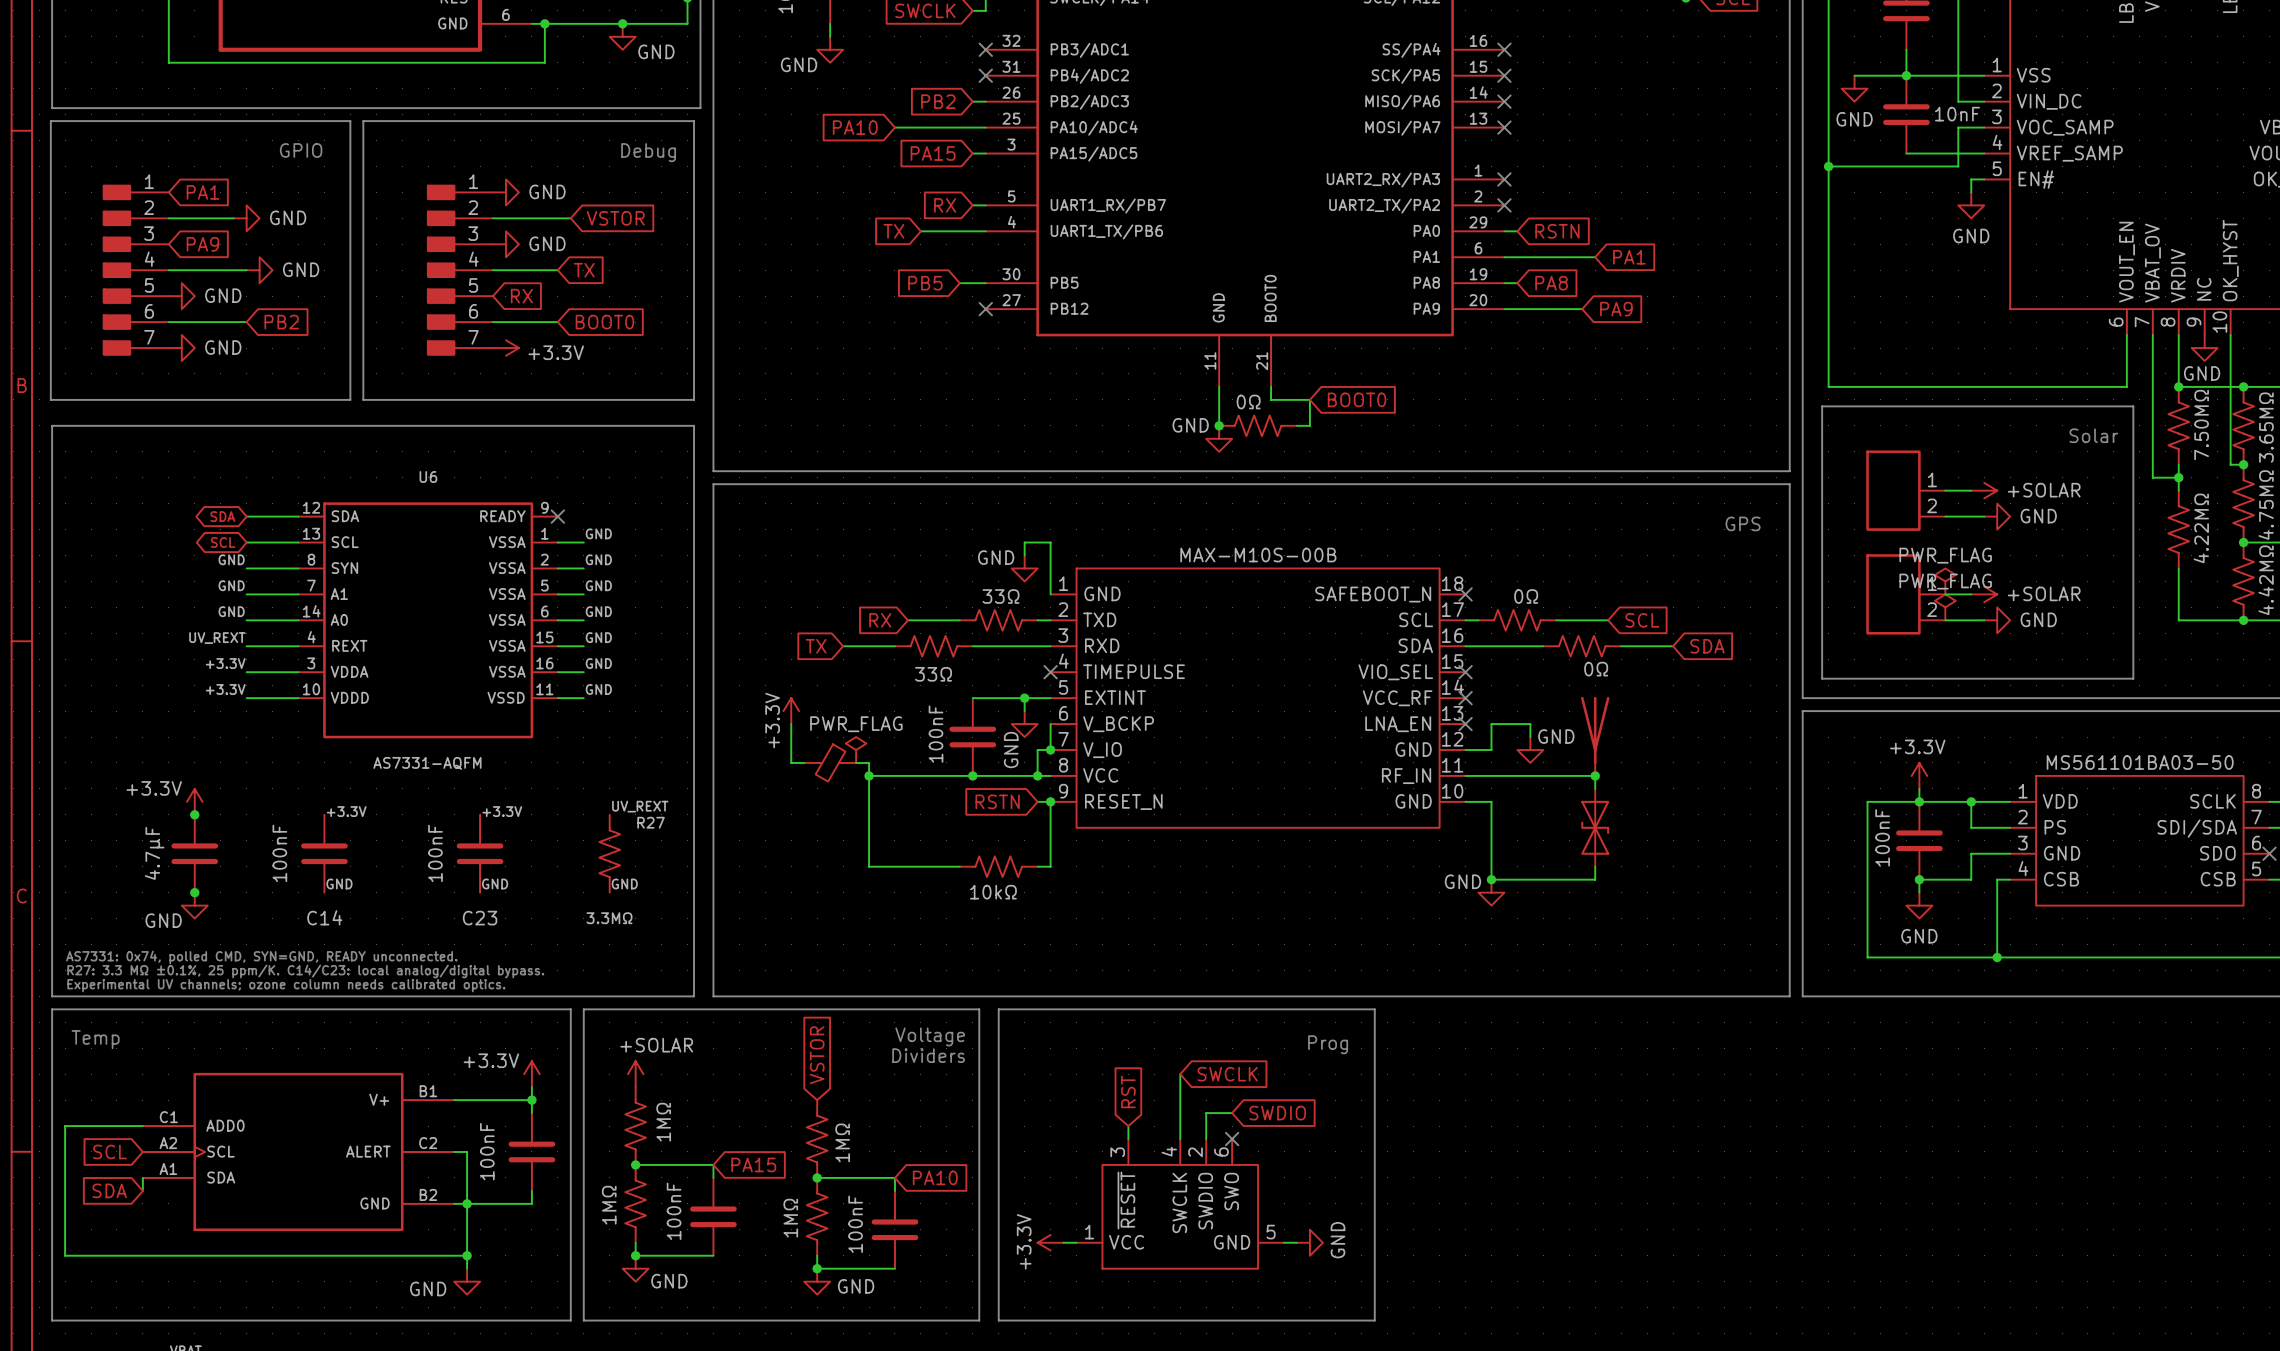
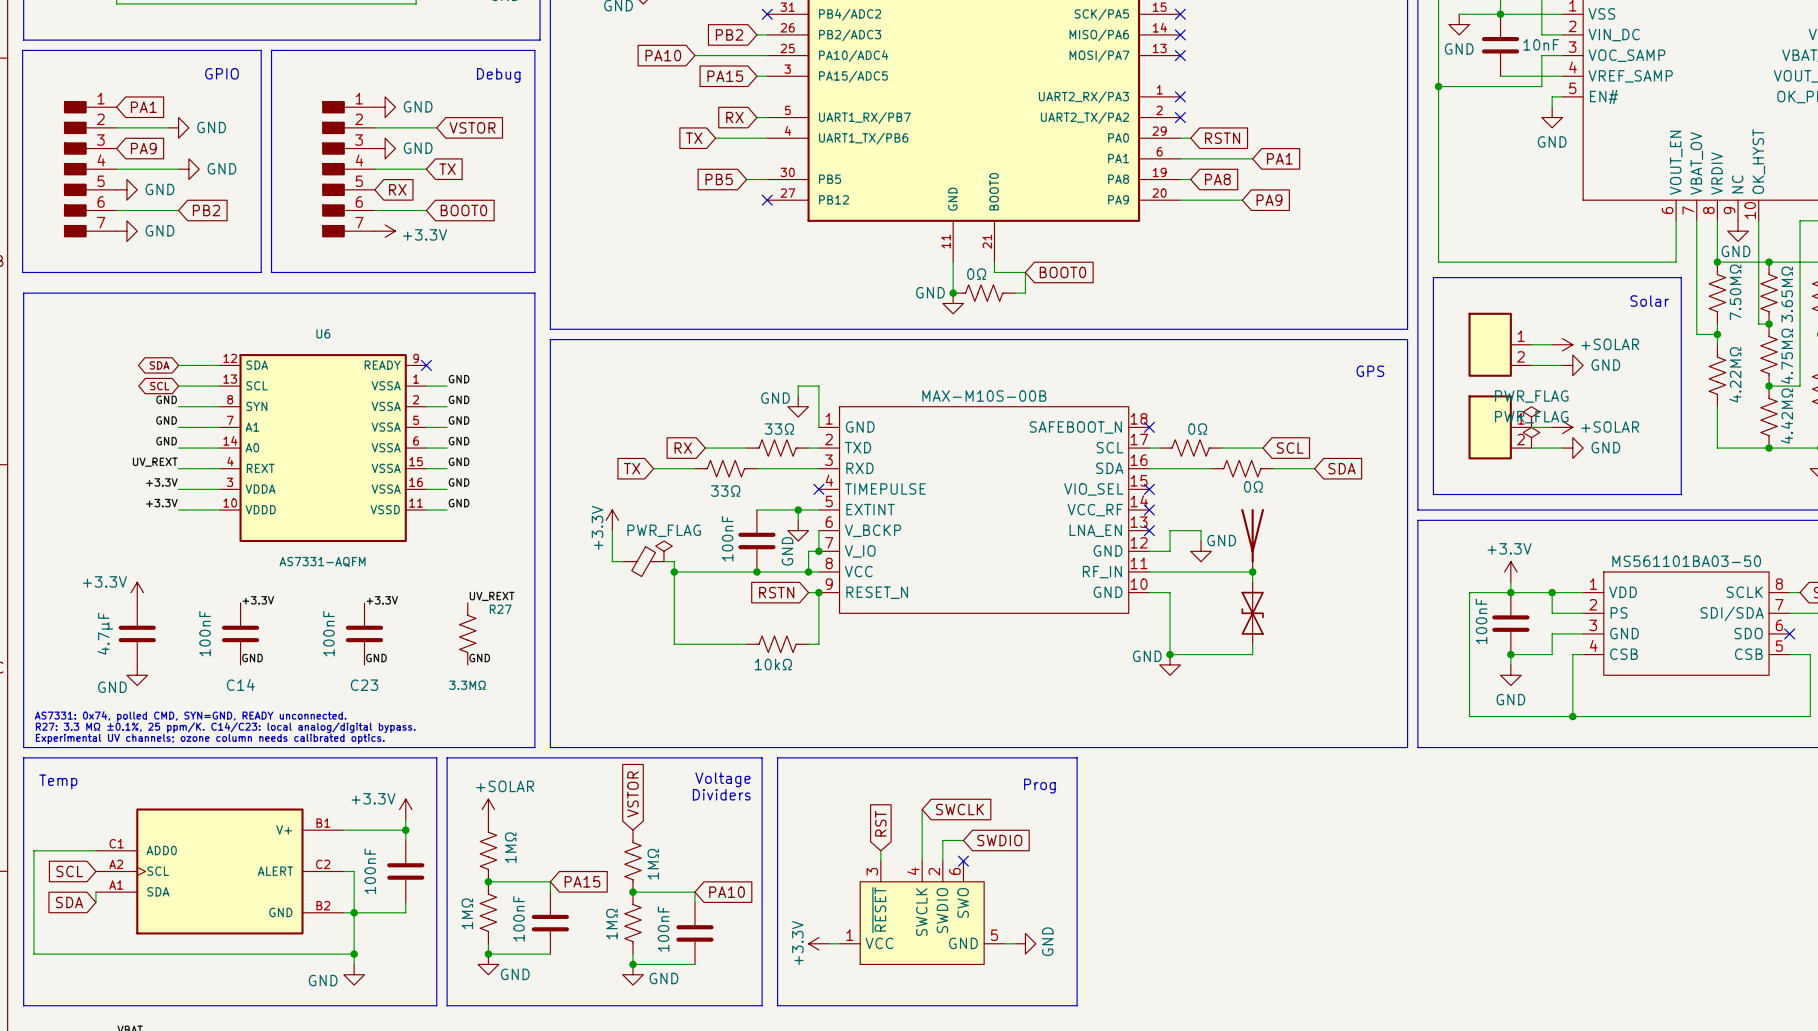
junction: (194, 814) -> none
junction: (194, 892) -> none

